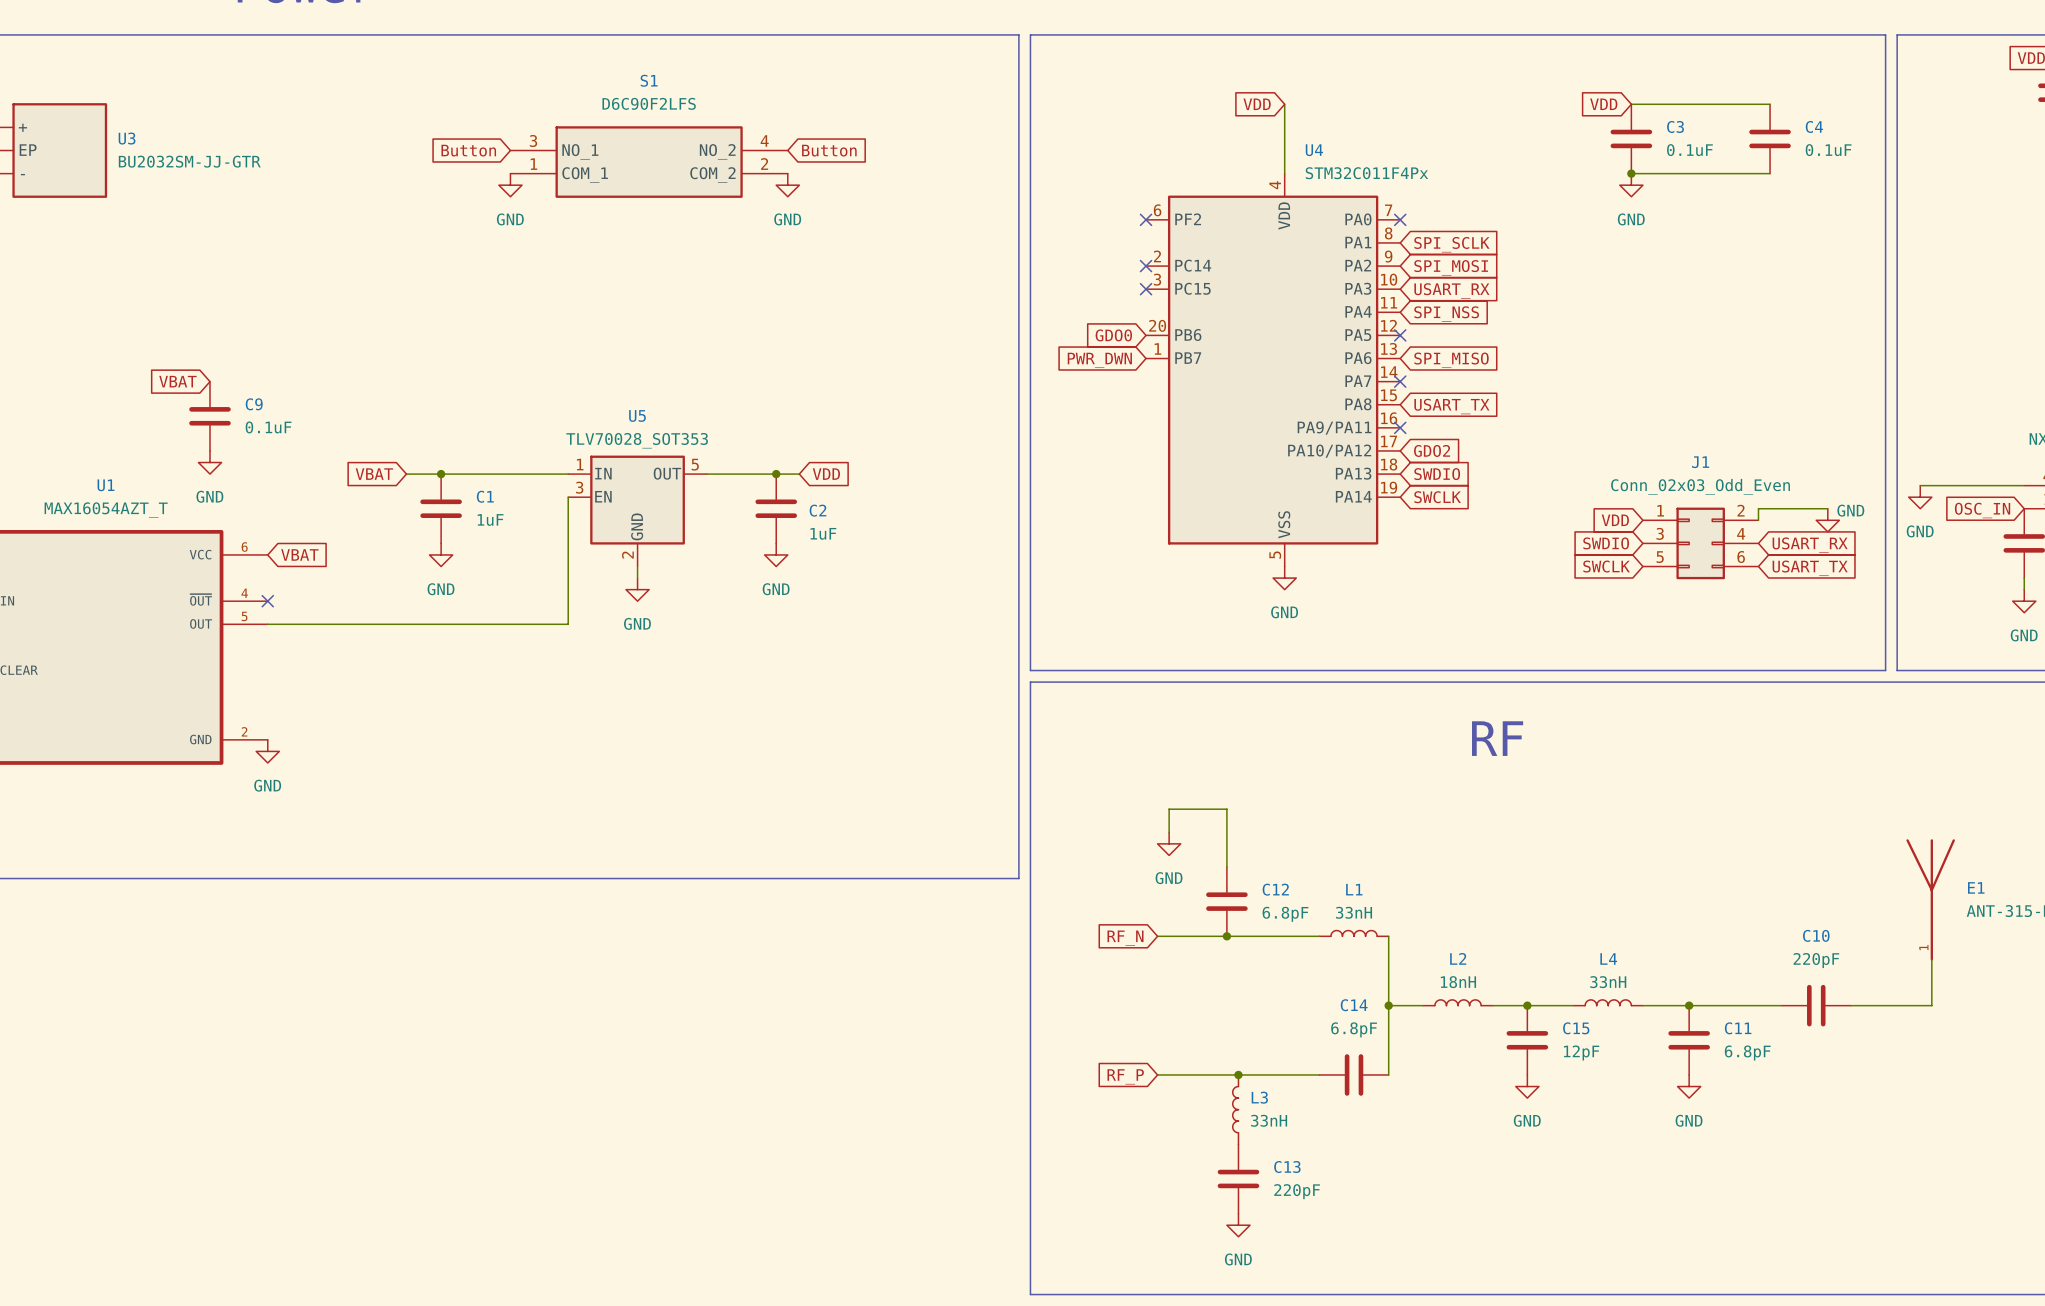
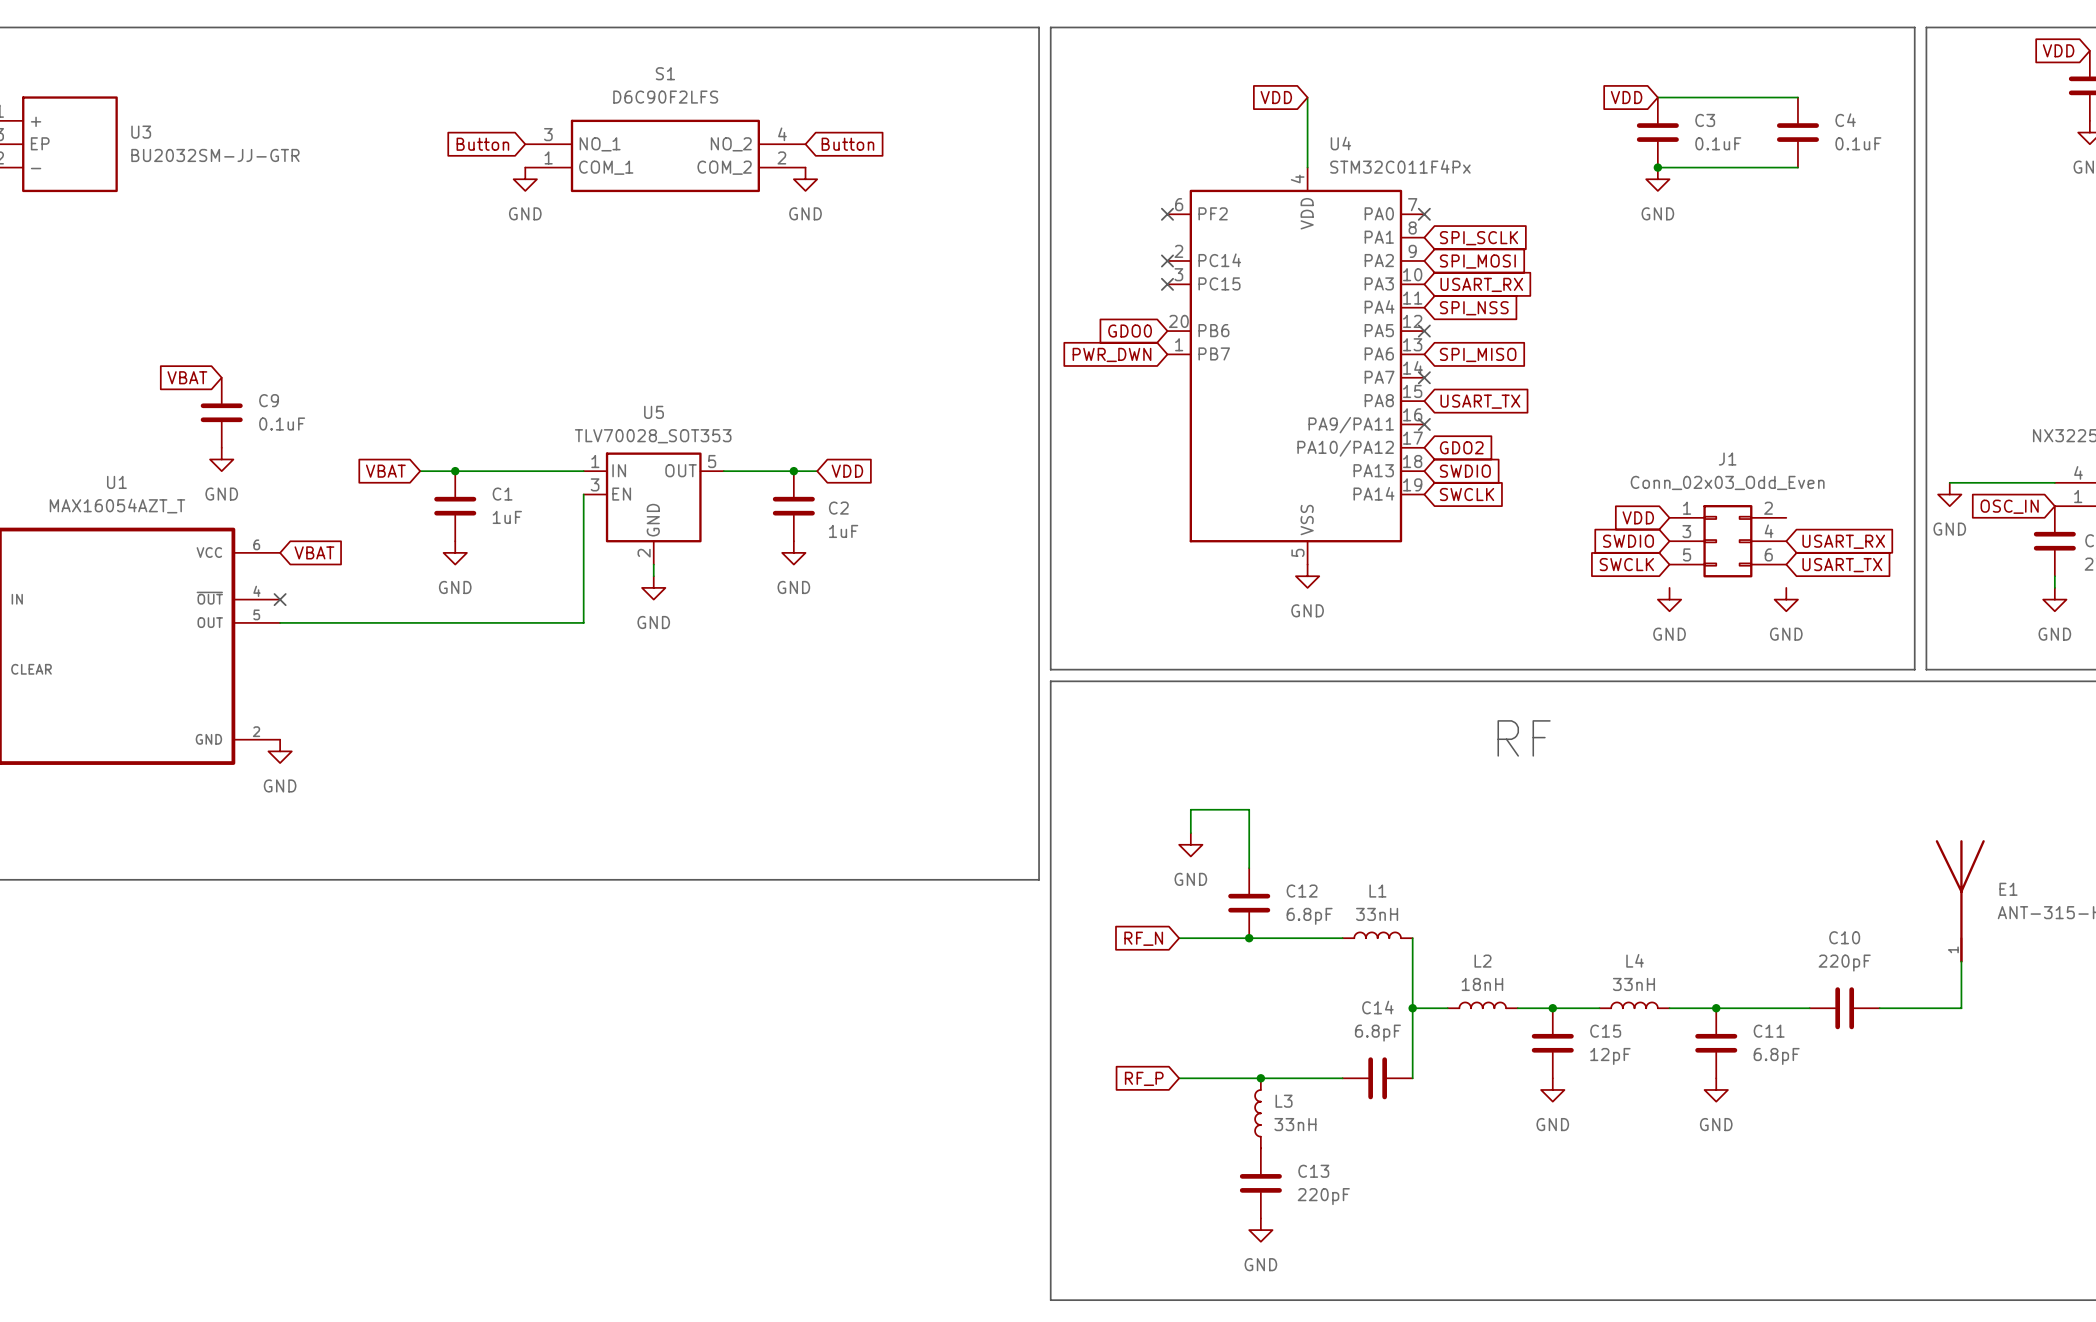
wire: (1827, 508) (1758, 508) (1758, 520) -> none
power symbol: GND (1827, 520) -> none
power symbol: none -> GND (1669, 599)
power symbol: none -> GND (1786, 599)

